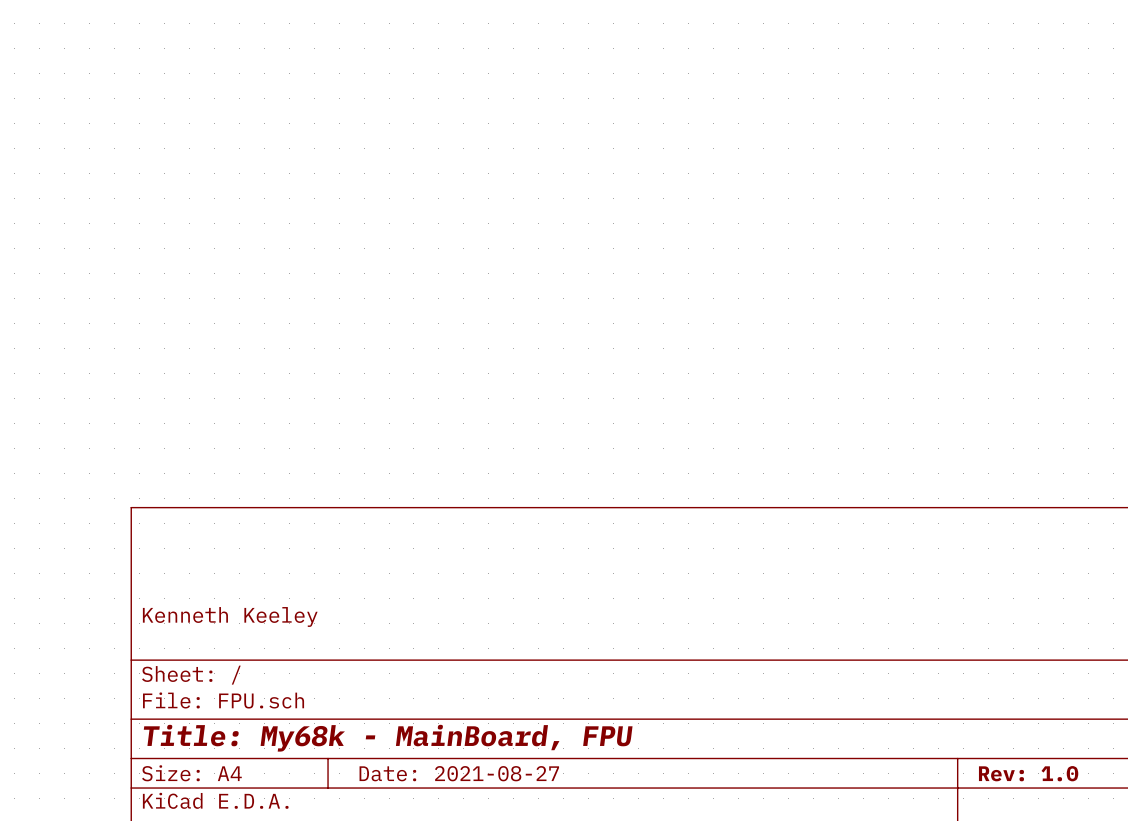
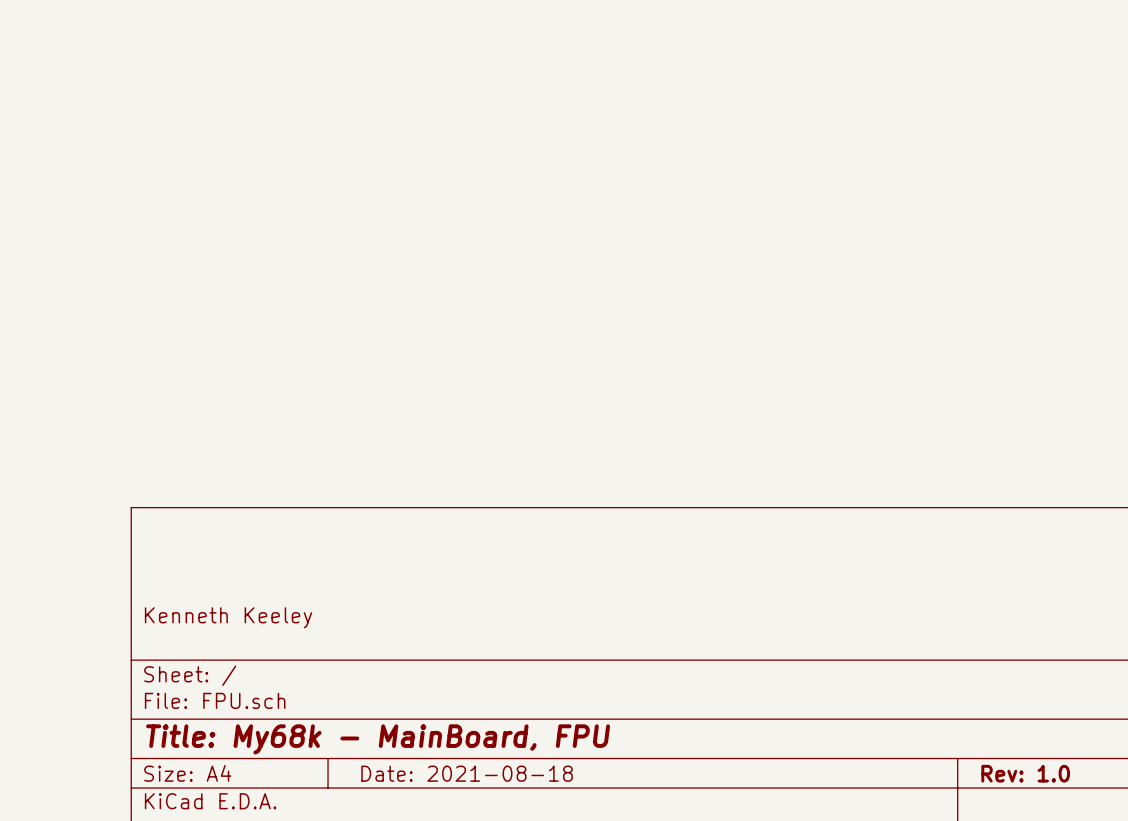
title block: Date: 2021-08-27 (459, 773) -> Date: 2021-08-18 (467, 773)

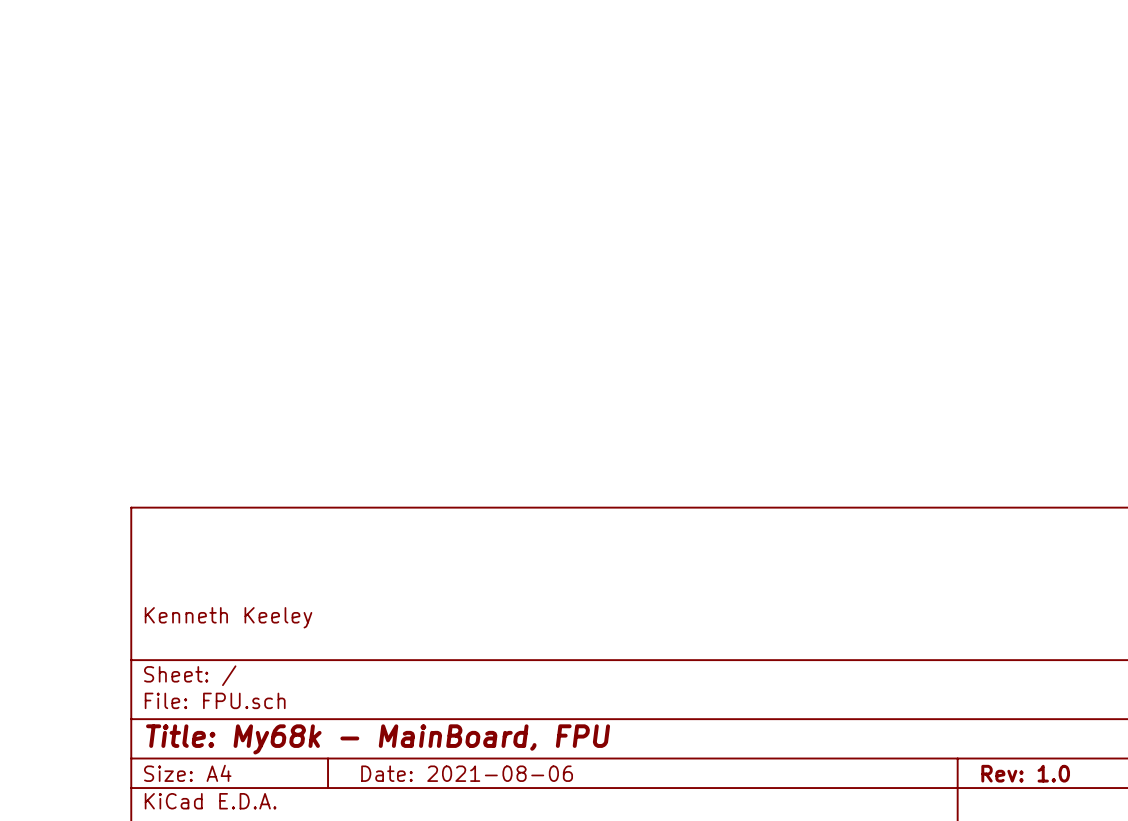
title block: Date: 2021-08-18 (467, 773) -> Date: 2021-08-06 (467, 773)

